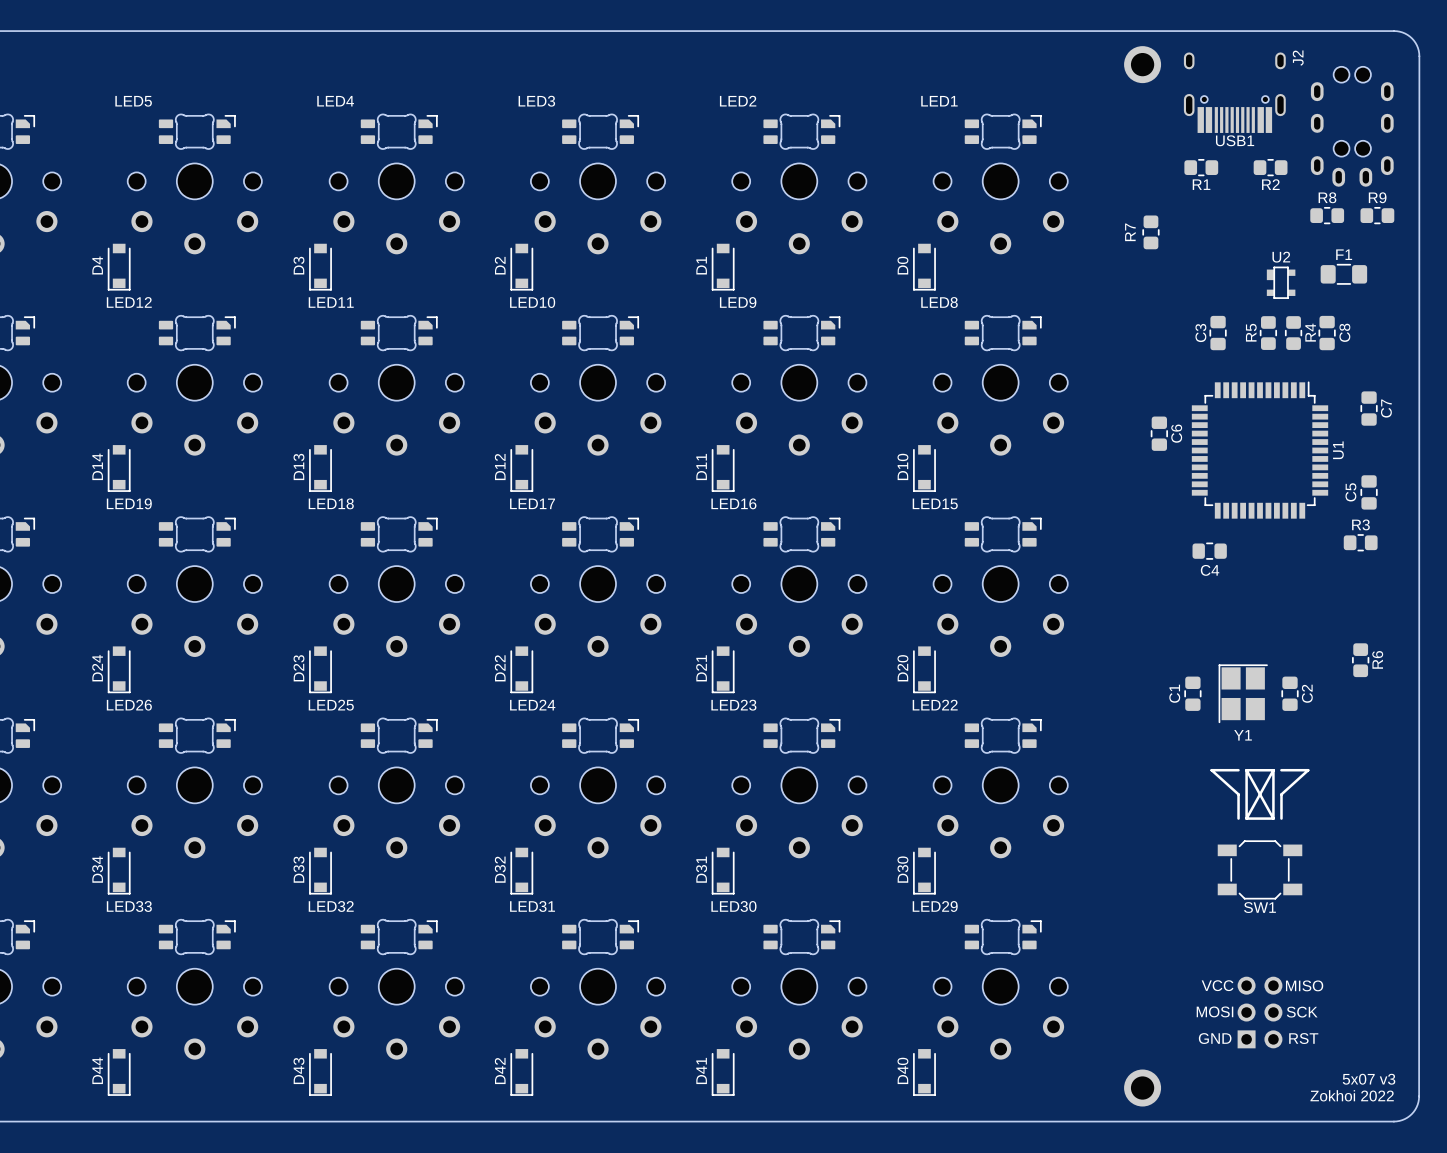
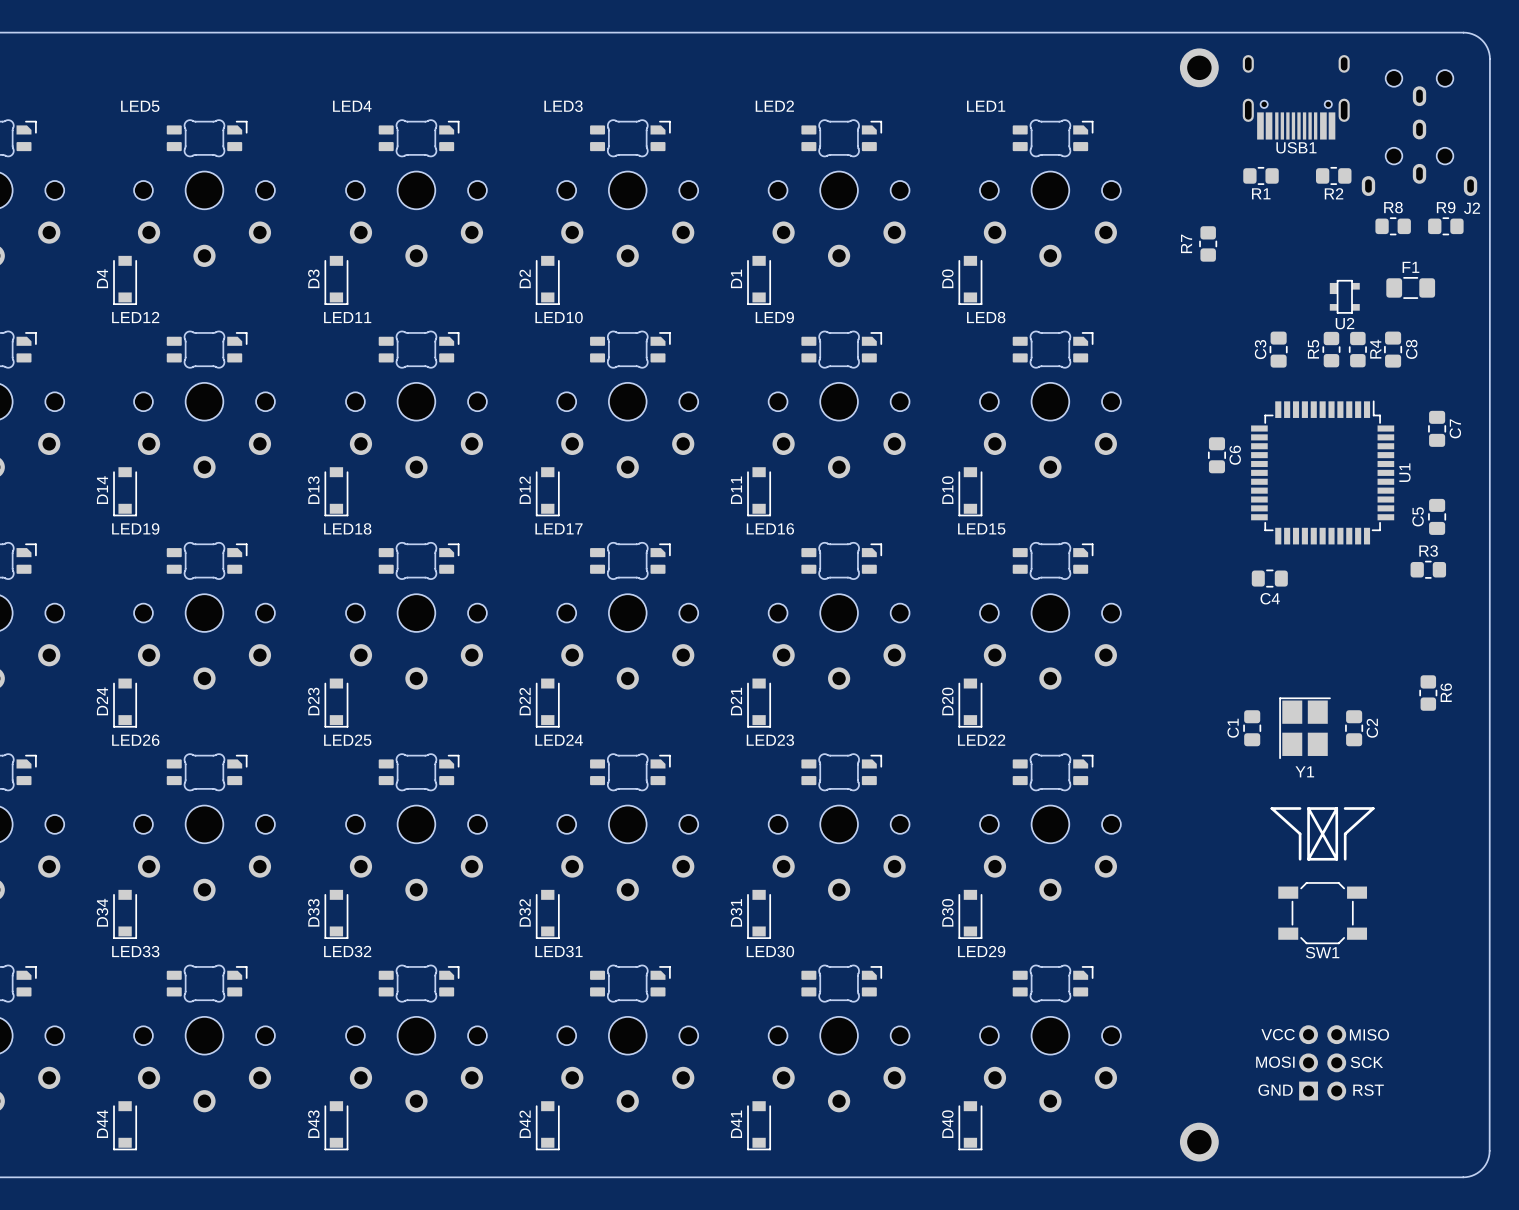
J2 name position: J2 (1298, 58) -> J2 (1472, 208)
J2 footprint: [1310, 66, 1394, 187] -> [1361, 70, 1478, 197]
U2 name position: U2 (1281, 257) -> U2 (1345, 323)
text: 5x07 v3 (1369, 1079) -> none
text: Zokhoi 2022 (1352, 1095) -> none

